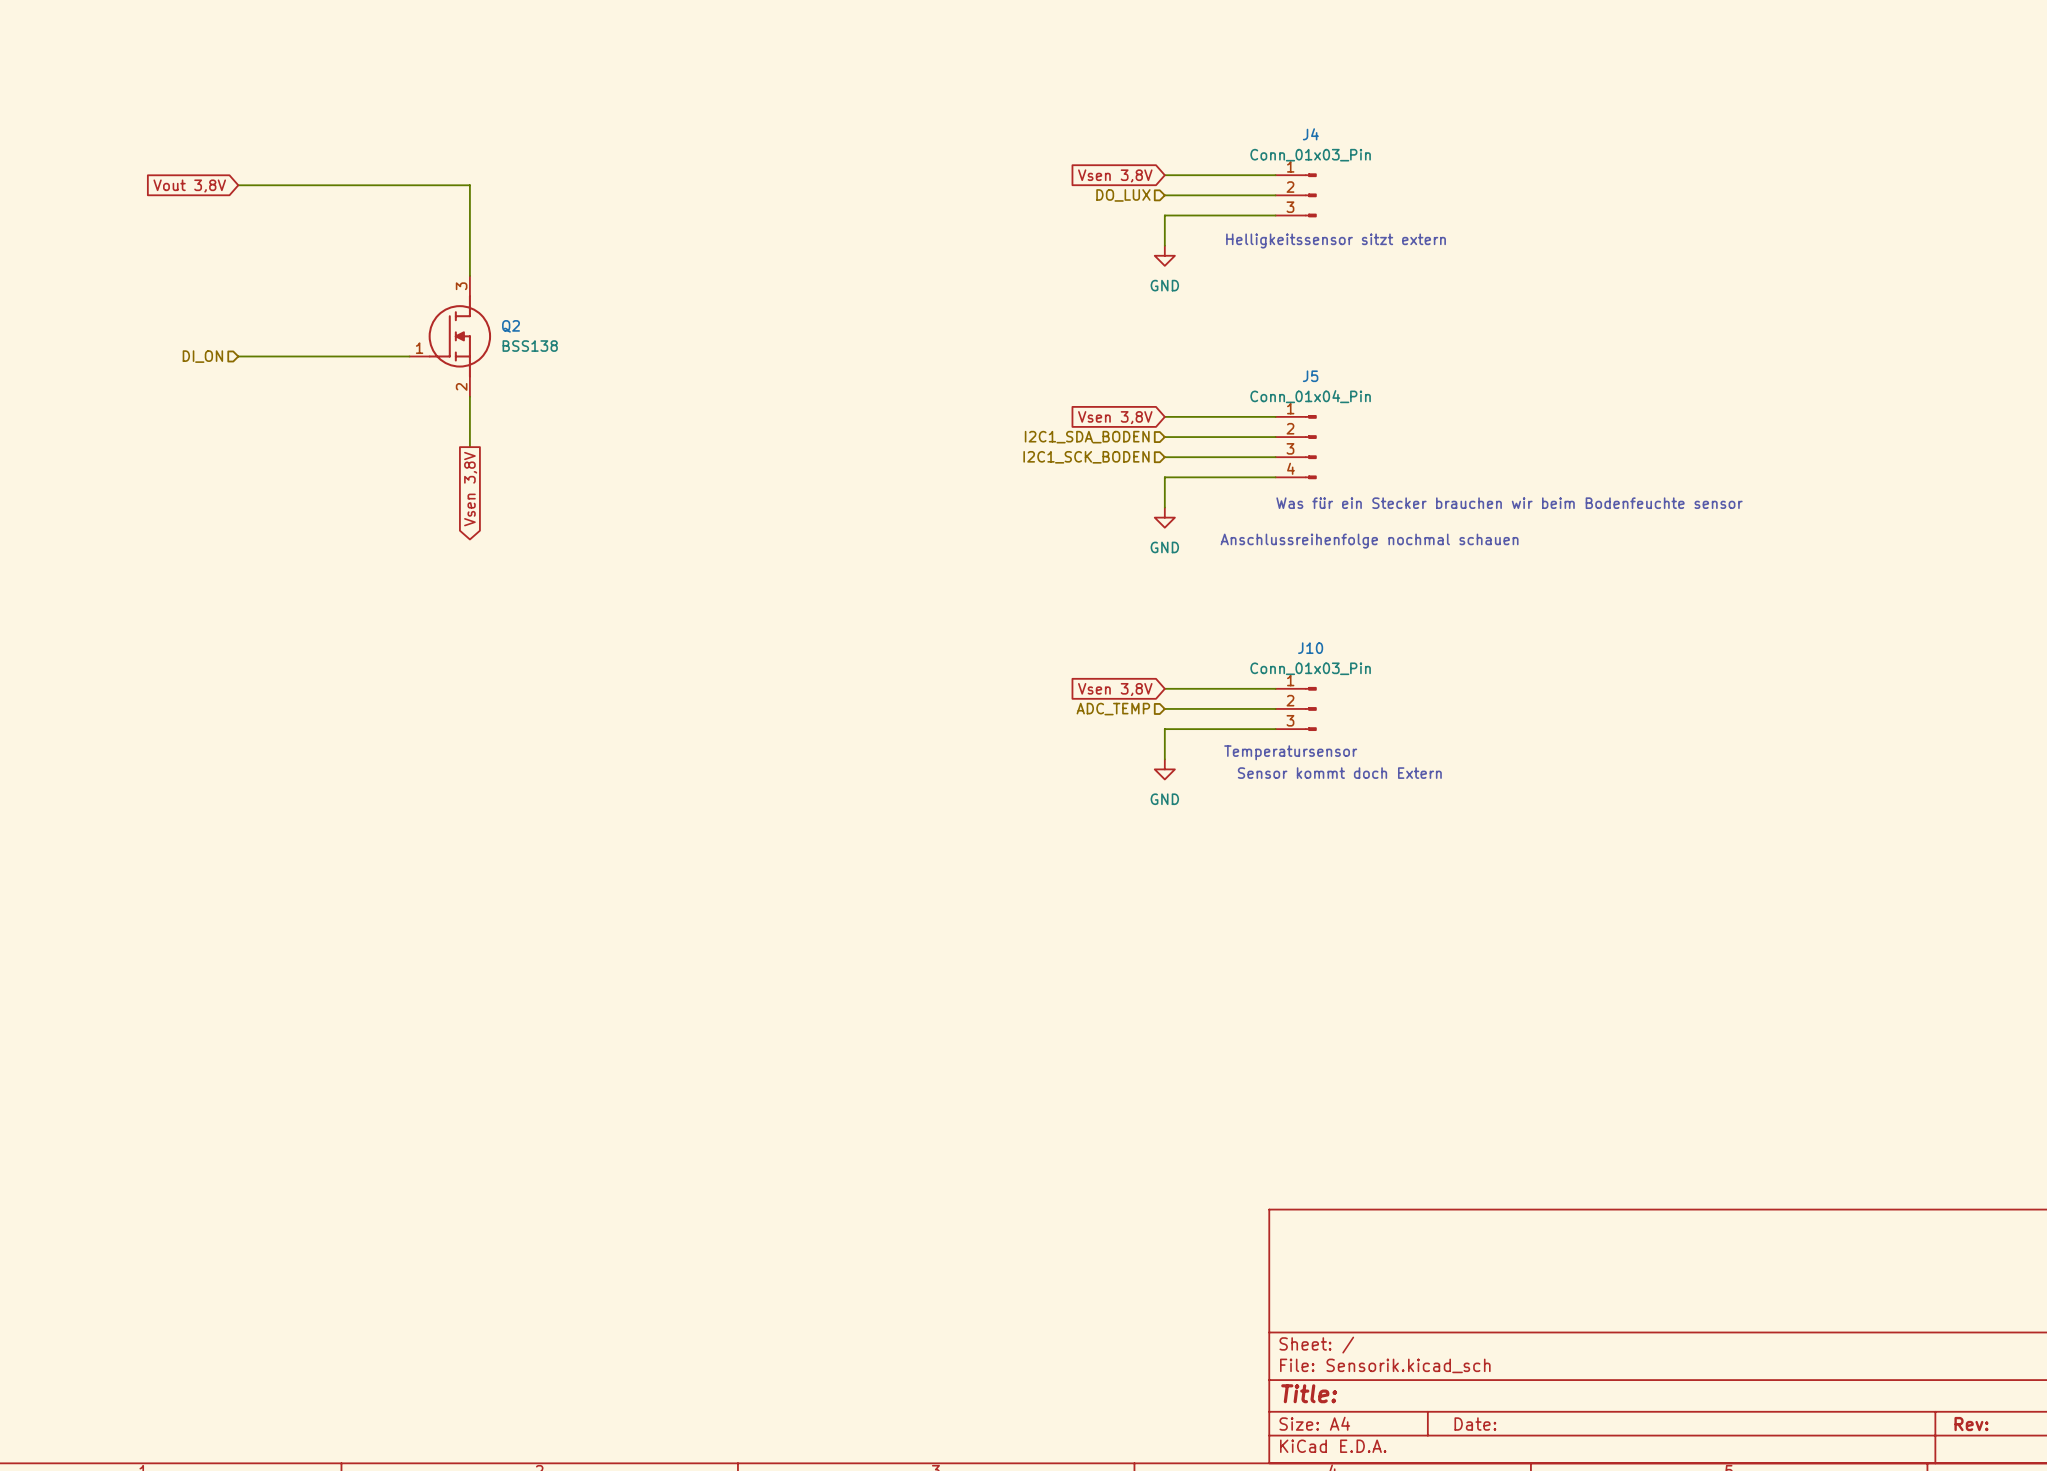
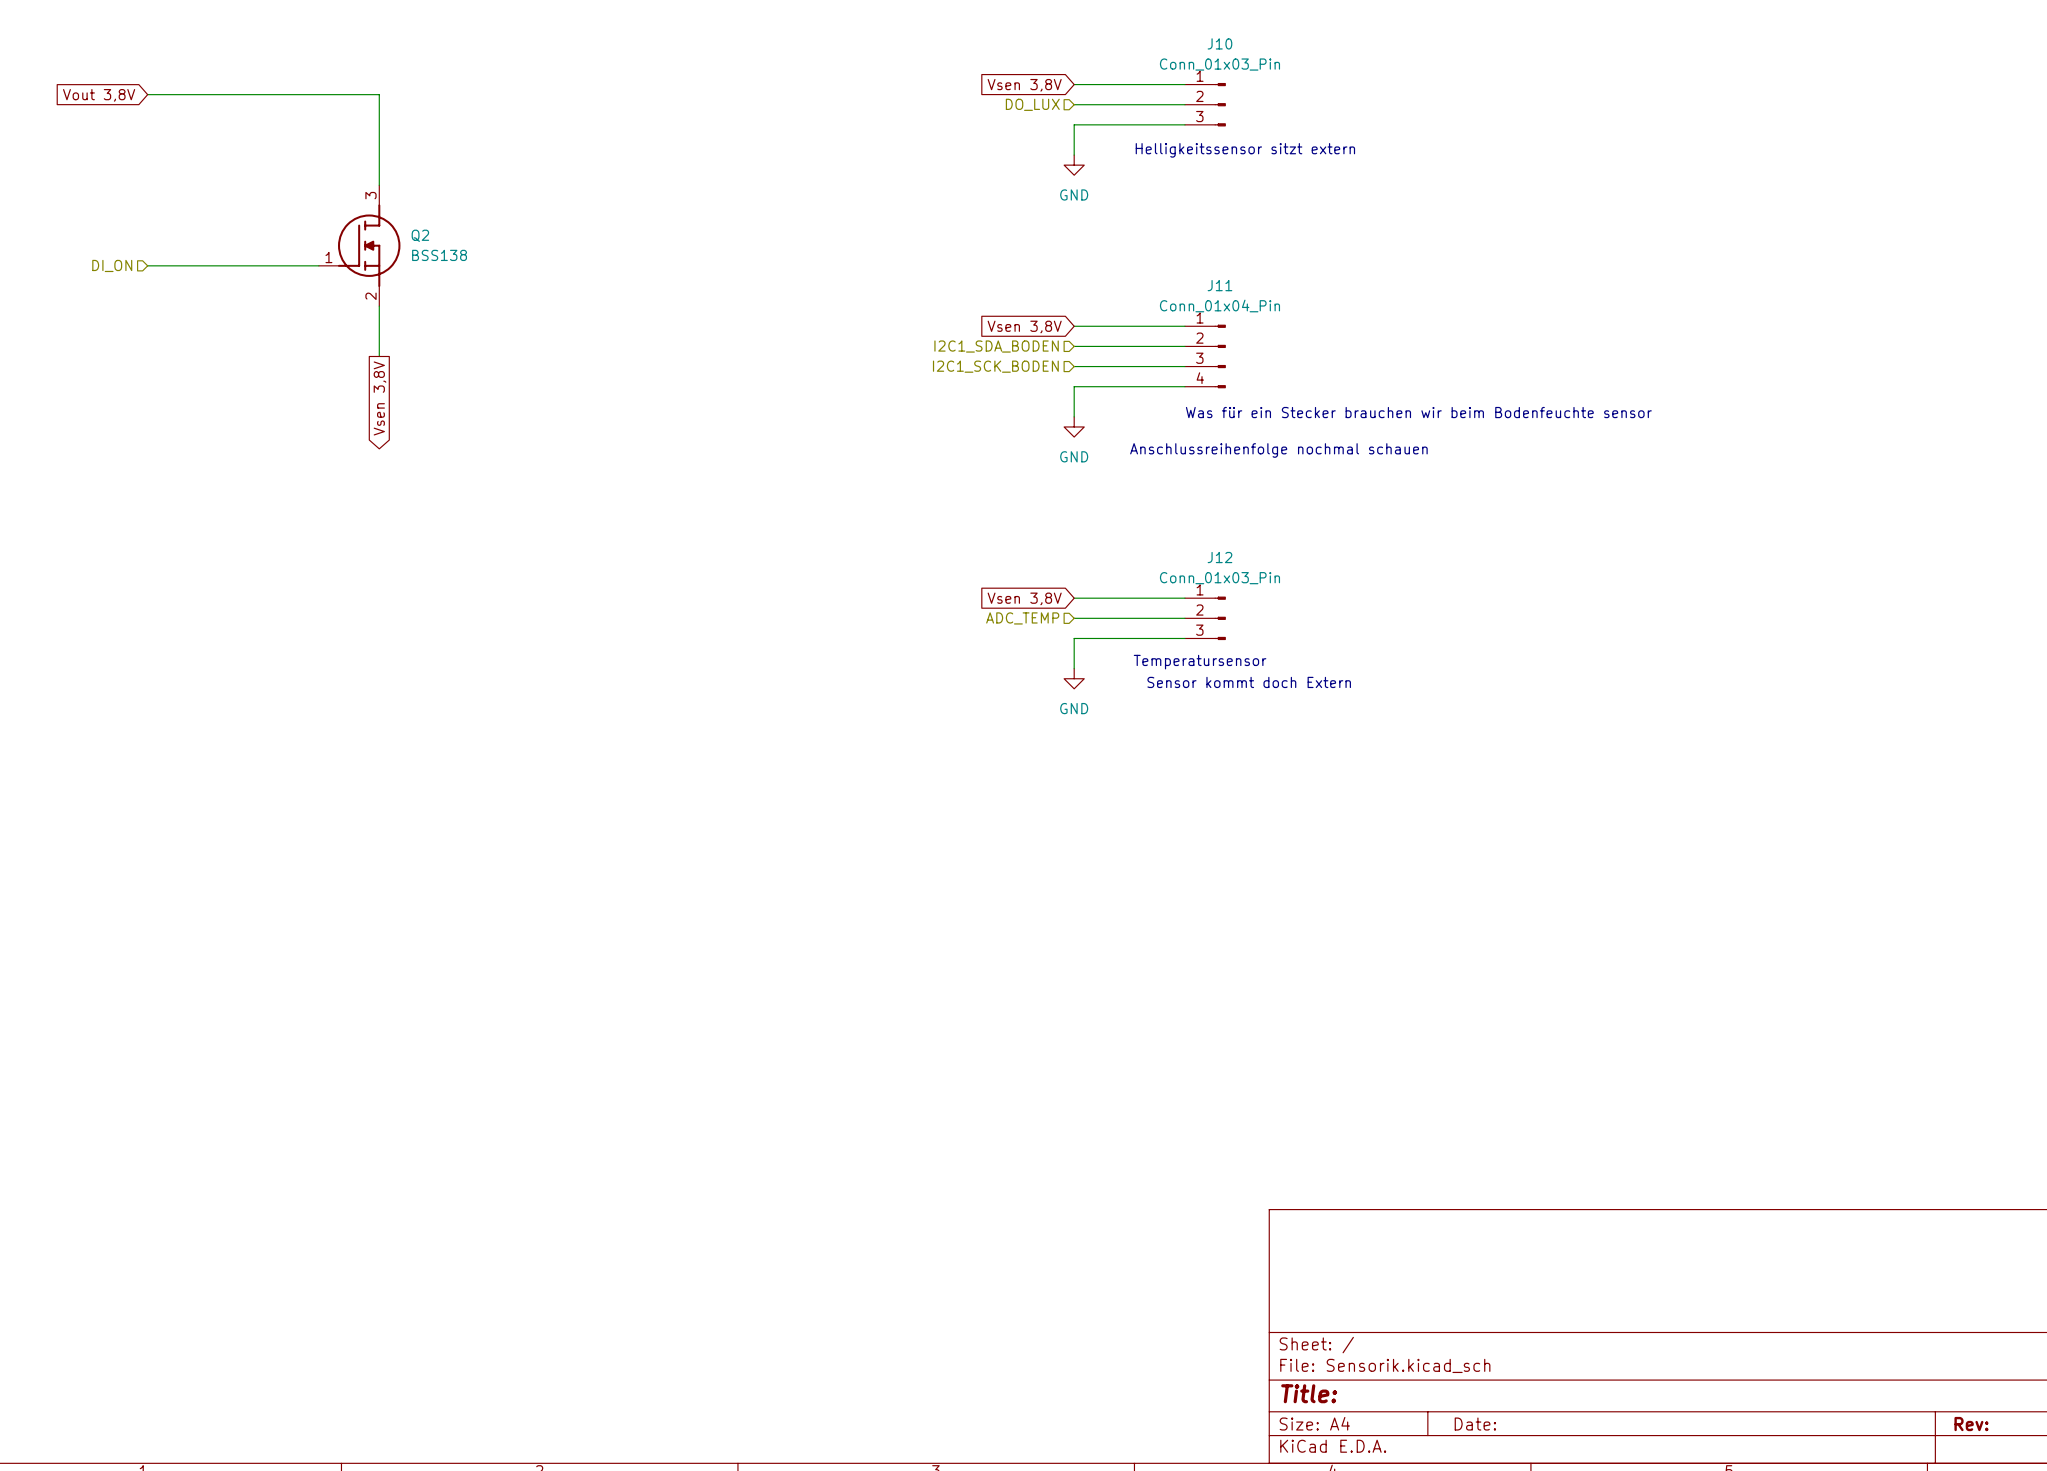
global label: none -> Vsen 3,8V (1024, 85)
power symbol: none -> GND (1074, 165)
global label: Vsen 3,8V (1115, 175) -> none
wire: (1164, 175) (1275, 175) -> (1074, 84) (1184, 84)
wire: (238, 185) (469, 185) (469, 275) -> (147, 94) (379, 94) (379, 185)
global label position: Vout 3,8V (189, 186) -> Vout 3,8V (99, 95)
hierarchical label position: DO_LUX (1123, 195) -> DO_LUX (1032, 104)
wire: (1164, 195) (1275, 195) -> (1074, 104) (1184, 104)
J4: Conn_01x03_Pin (1296, 195) -> none
wire: (1275, 215) (1164, 215) (1164, 245) -> (1184, 124) (1074, 124) (1074, 155)
text position: Helligkeitssensor sitzt extern (1336, 241) -> Helligkeitssensor sitzt extern (1245, 150)
power symbol: GND (1164, 255) -> none
global label: none -> Vsen 3,8V (1024, 326)
Q2 position: (450, 336) -> (359, 245)
hierarchical label position: DI_ON (202, 356) -> DI_ON (112, 265)
wire: (238, 356) (409, 356) -> (147, 265) (318, 265)
J11: none -> Conn_01x04_Pin (1205, 356)
wire: (469, 396) (469, 447) -> (379, 306) (379, 356)
wire: (1164, 416) (1275, 416) -> (1074, 326) (1184, 326)
global label: Vsen 3,8V (1115, 417) -> none
power symbol: none -> GND (1074, 426)
hierarchical label position: I2C1_SDA_BODEN (1087, 437) -> I2C1_SDA_BODEN (996, 346)
wire: (1164, 437) (1275, 437) -> (1074, 346) (1184, 346)
J5: Conn_01x04_Pin (1296, 447) -> none
hierarchical label position: I2C1_SCK_BODEN (1086, 457) -> I2C1_SCK_BODEN (995, 366)
wire: (1164, 457) (1275, 457) -> (1074, 366) (1184, 366)
wire: (1275, 477) (1164, 477) (1164, 507) -> (1184, 386) (1074, 386) (1074, 416)
global label position: Vsen 3,8V (470, 489) -> Vsen 3,8V (380, 398)
text position: Was für ein Stecker brauchen wir beim Bodenfeuchte sensor (1509, 503) -> Was für ein Stecker brauchen wir beim Bodenfeuchte sensor (1418, 412)
power symbol: GND (1164, 517) -> none
text position: Anschlussreihenfolge nochmal schauen (1369, 541) -> Anschlussreihenfolge nochmal schauen (1278, 450)
global label: none -> Vsen 3,8V (1024, 598)
J12: none -> Conn_01x03_Pin (1205, 618)
power symbol: none -> GND (1074, 678)
wire: (1164, 688) (1275, 688) -> (1074, 598) (1184, 598)
global label: Vsen 3,8V (1115, 689) -> none
wire: (1164, 708) (1275, 708) -> (1074, 618) (1184, 618)
J10 position: (1296, 708) -> (1205, 104)
hierarchical label position: ADC_TEMP (1113, 709) -> ADC_TEMP (1022, 618)
wire: (1275, 729) (1164, 729) (1164, 759) -> (1184, 638) (1074, 638) (1074, 668)
text position: Temperatursensor (1290, 752) -> Temperatursensor (1200, 662)
power symbol: GND (1164, 769) -> none
text position: Sensor kommt doch Extern (1339, 773) -> Sensor kommt doch Extern (1249, 682)

